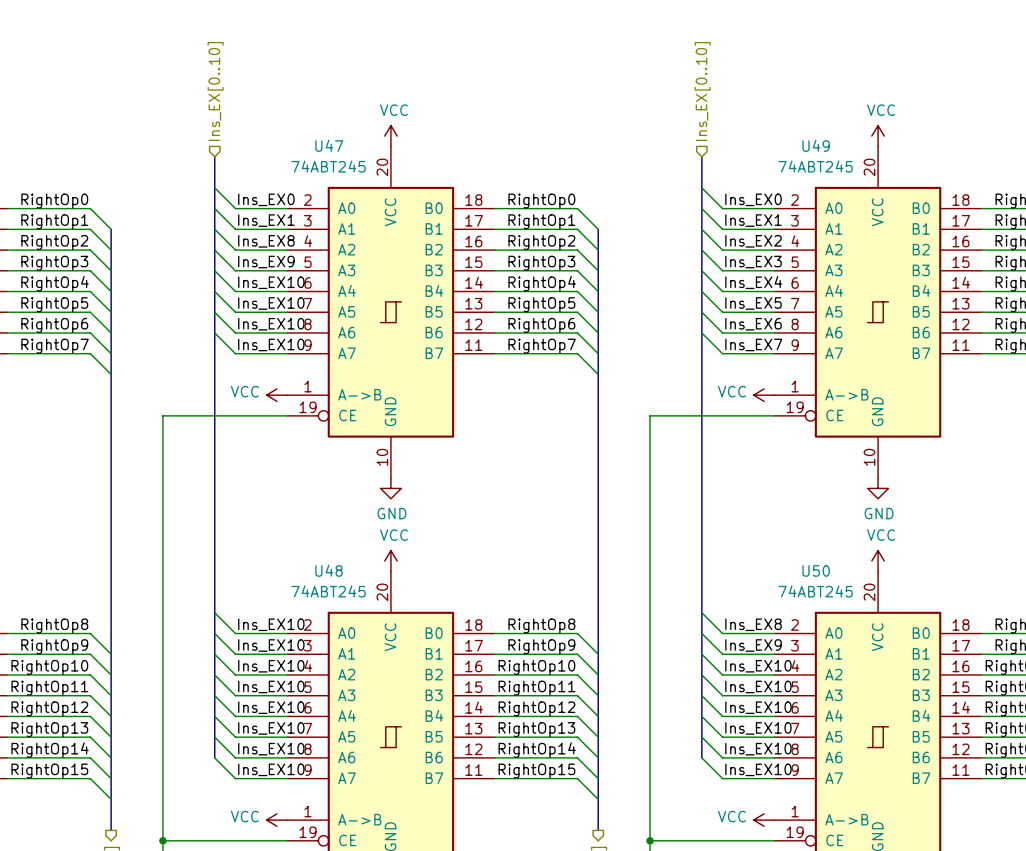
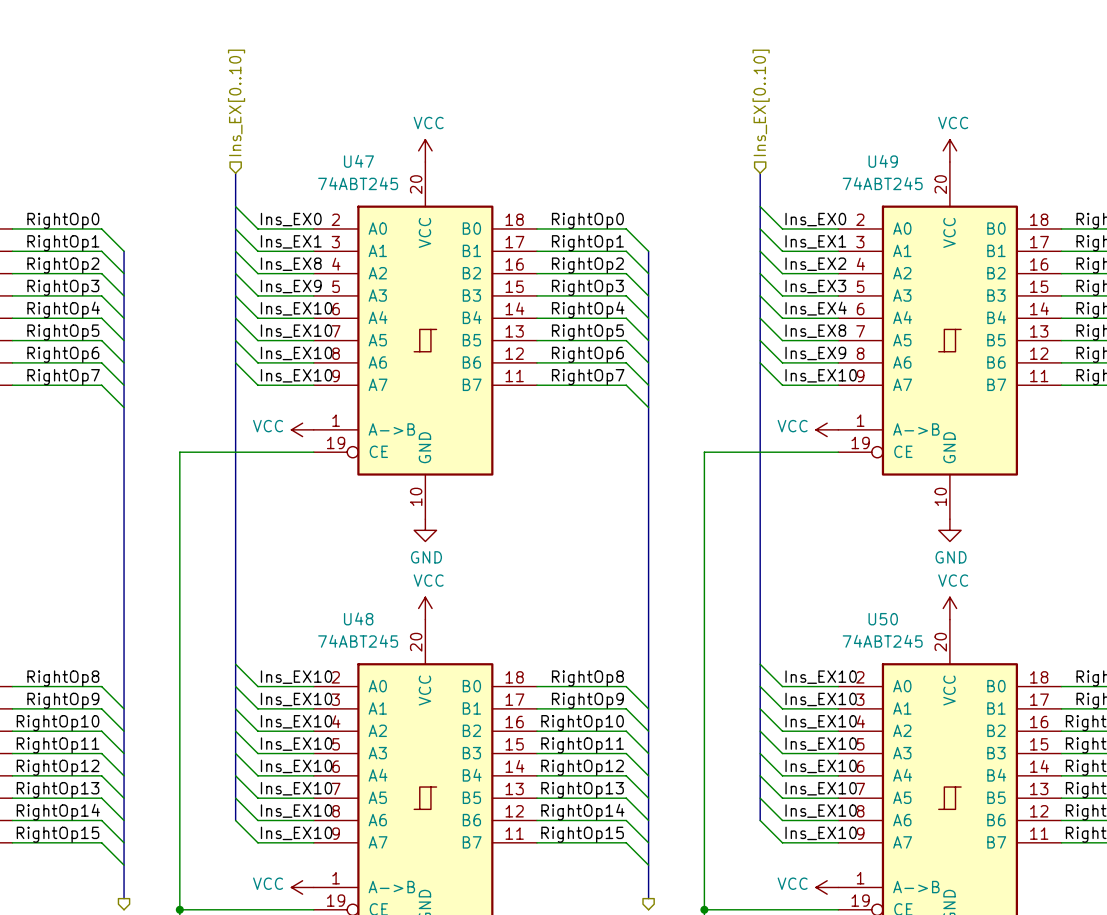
label: Ins_EX5 (753, 303) -> Ins_EX8 (815, 331)
label: Ins_EX6 (753, 324) -> Ins_EX9 (815, 353)
label: Ins_EX7 (753, 344) -> Ins_EX10 (821, 375)
label: Ins_EX8 (753, 624) -> Ins_EX10 (821, 677)
label: Ins_EX9 (753, 645) -> Ins_EX10 (821, 699)

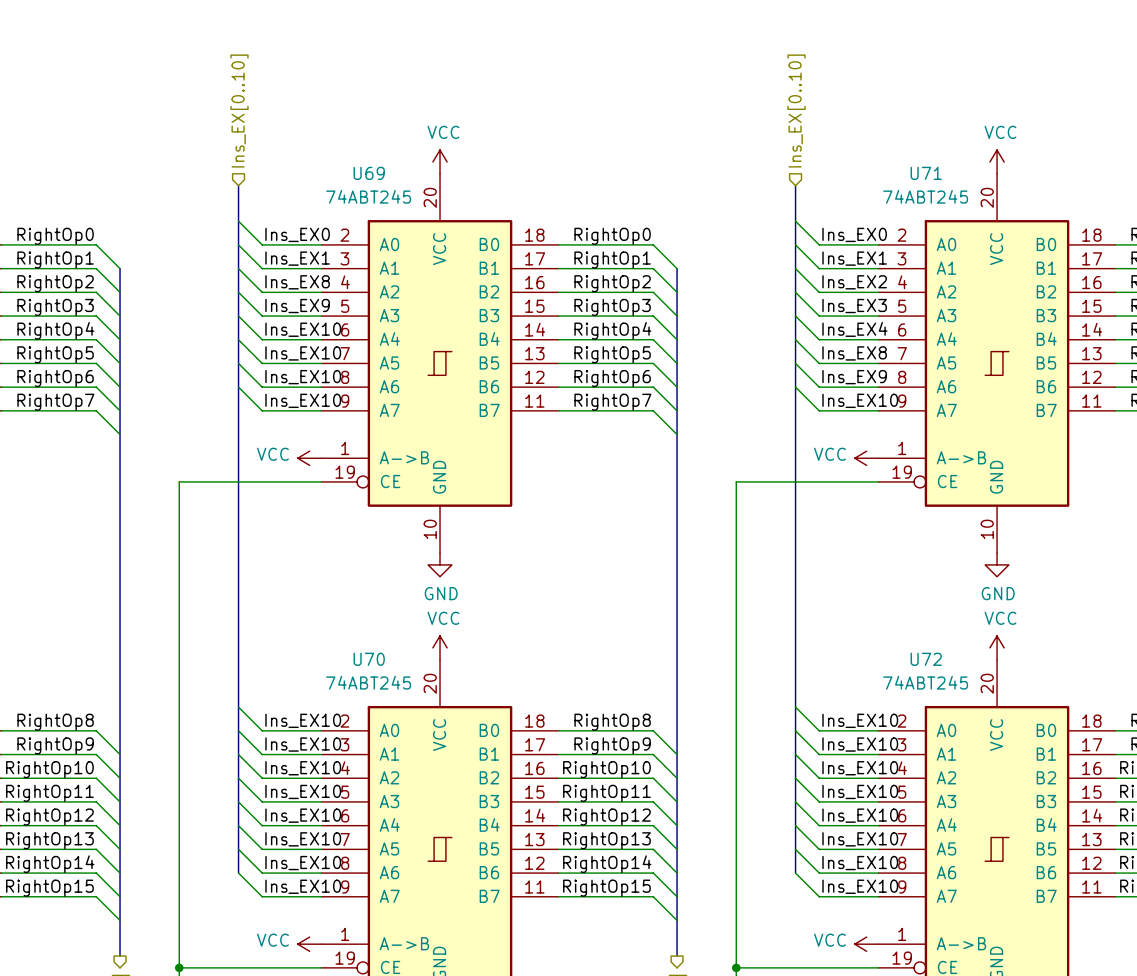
U47 name: U47 (358, 161) -> U69 (369, 173)
U49 name: U49 (883, 161) -> U71 (926, 173)
U48 name: U48 (358, 618) -> U70 (369, 659)
U50 name: U50 (883, 619) -> U72 (926, 659)

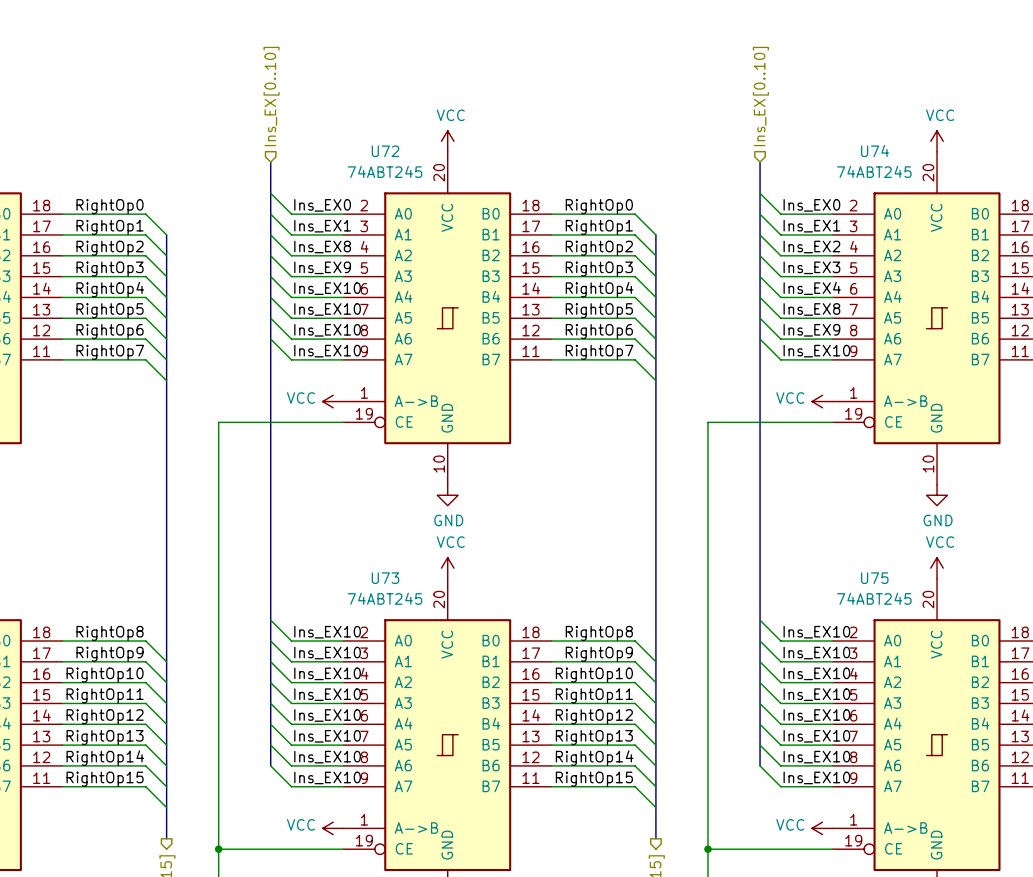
U69 name: U69 (369, 173) -> U72 (385, 151)
U71 name: U71 (926, 173) -> U74 (875, 151)
U70 name: U70 (369, 659) -> U73 (385, 578)
U72 name: U72 (926, 659) -> U75 (874, 578)

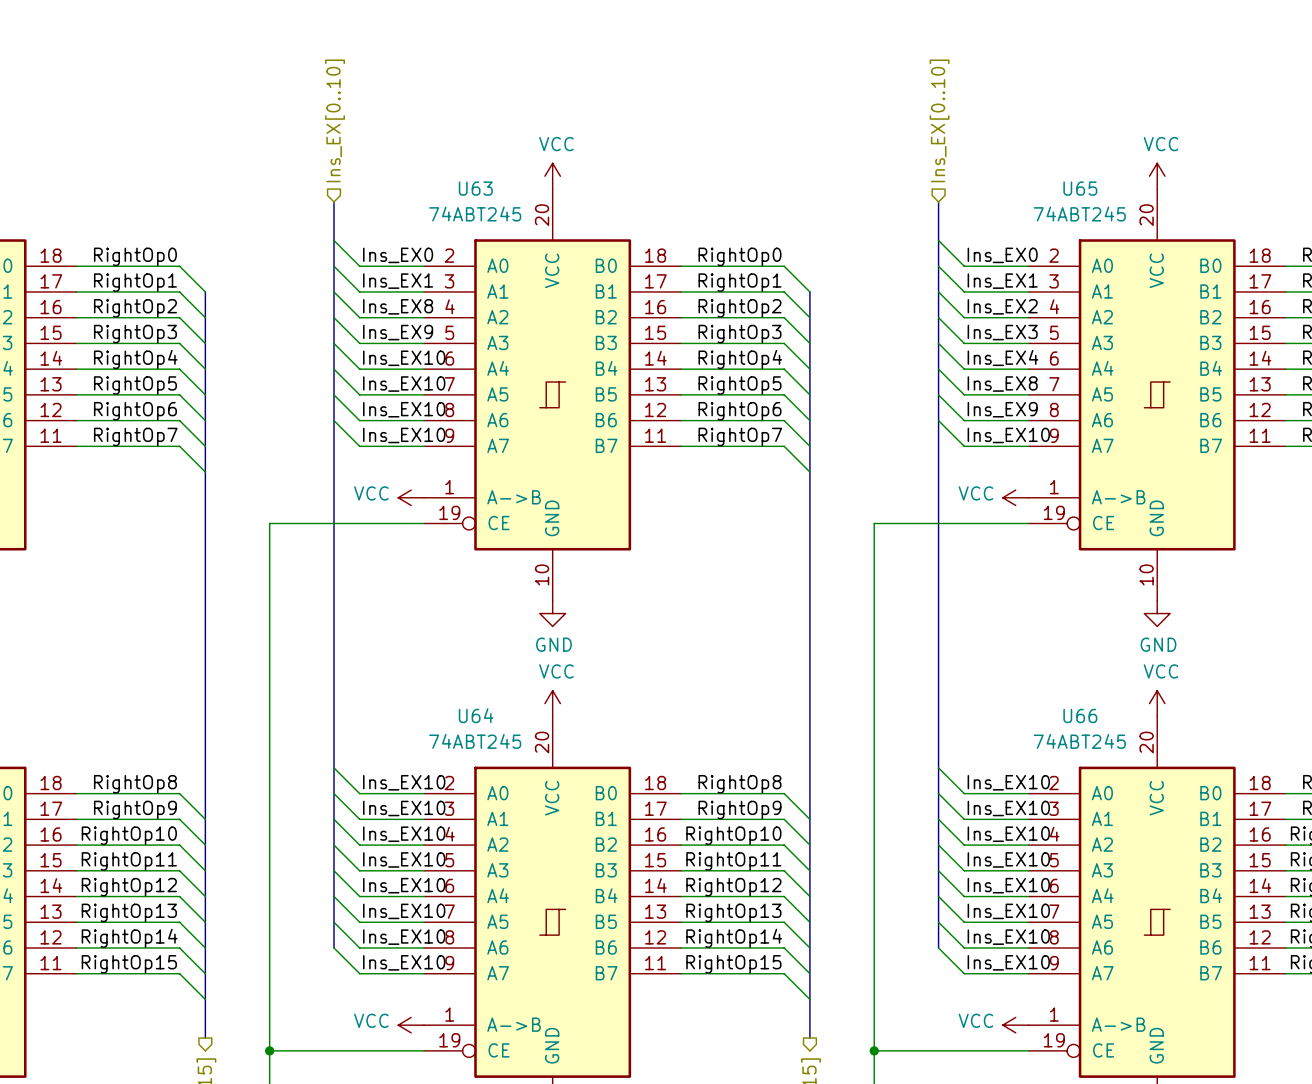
U72 name: U72 (385, 151) -> U63 (475, 188)
U74 name: U74 (875, 151) -> U65 (1080, 188)
U73 name: U73 (385, 578) -> U64 (476, 715)
U75 name: U75 (874, 578) -> U66 (1080, 715)

